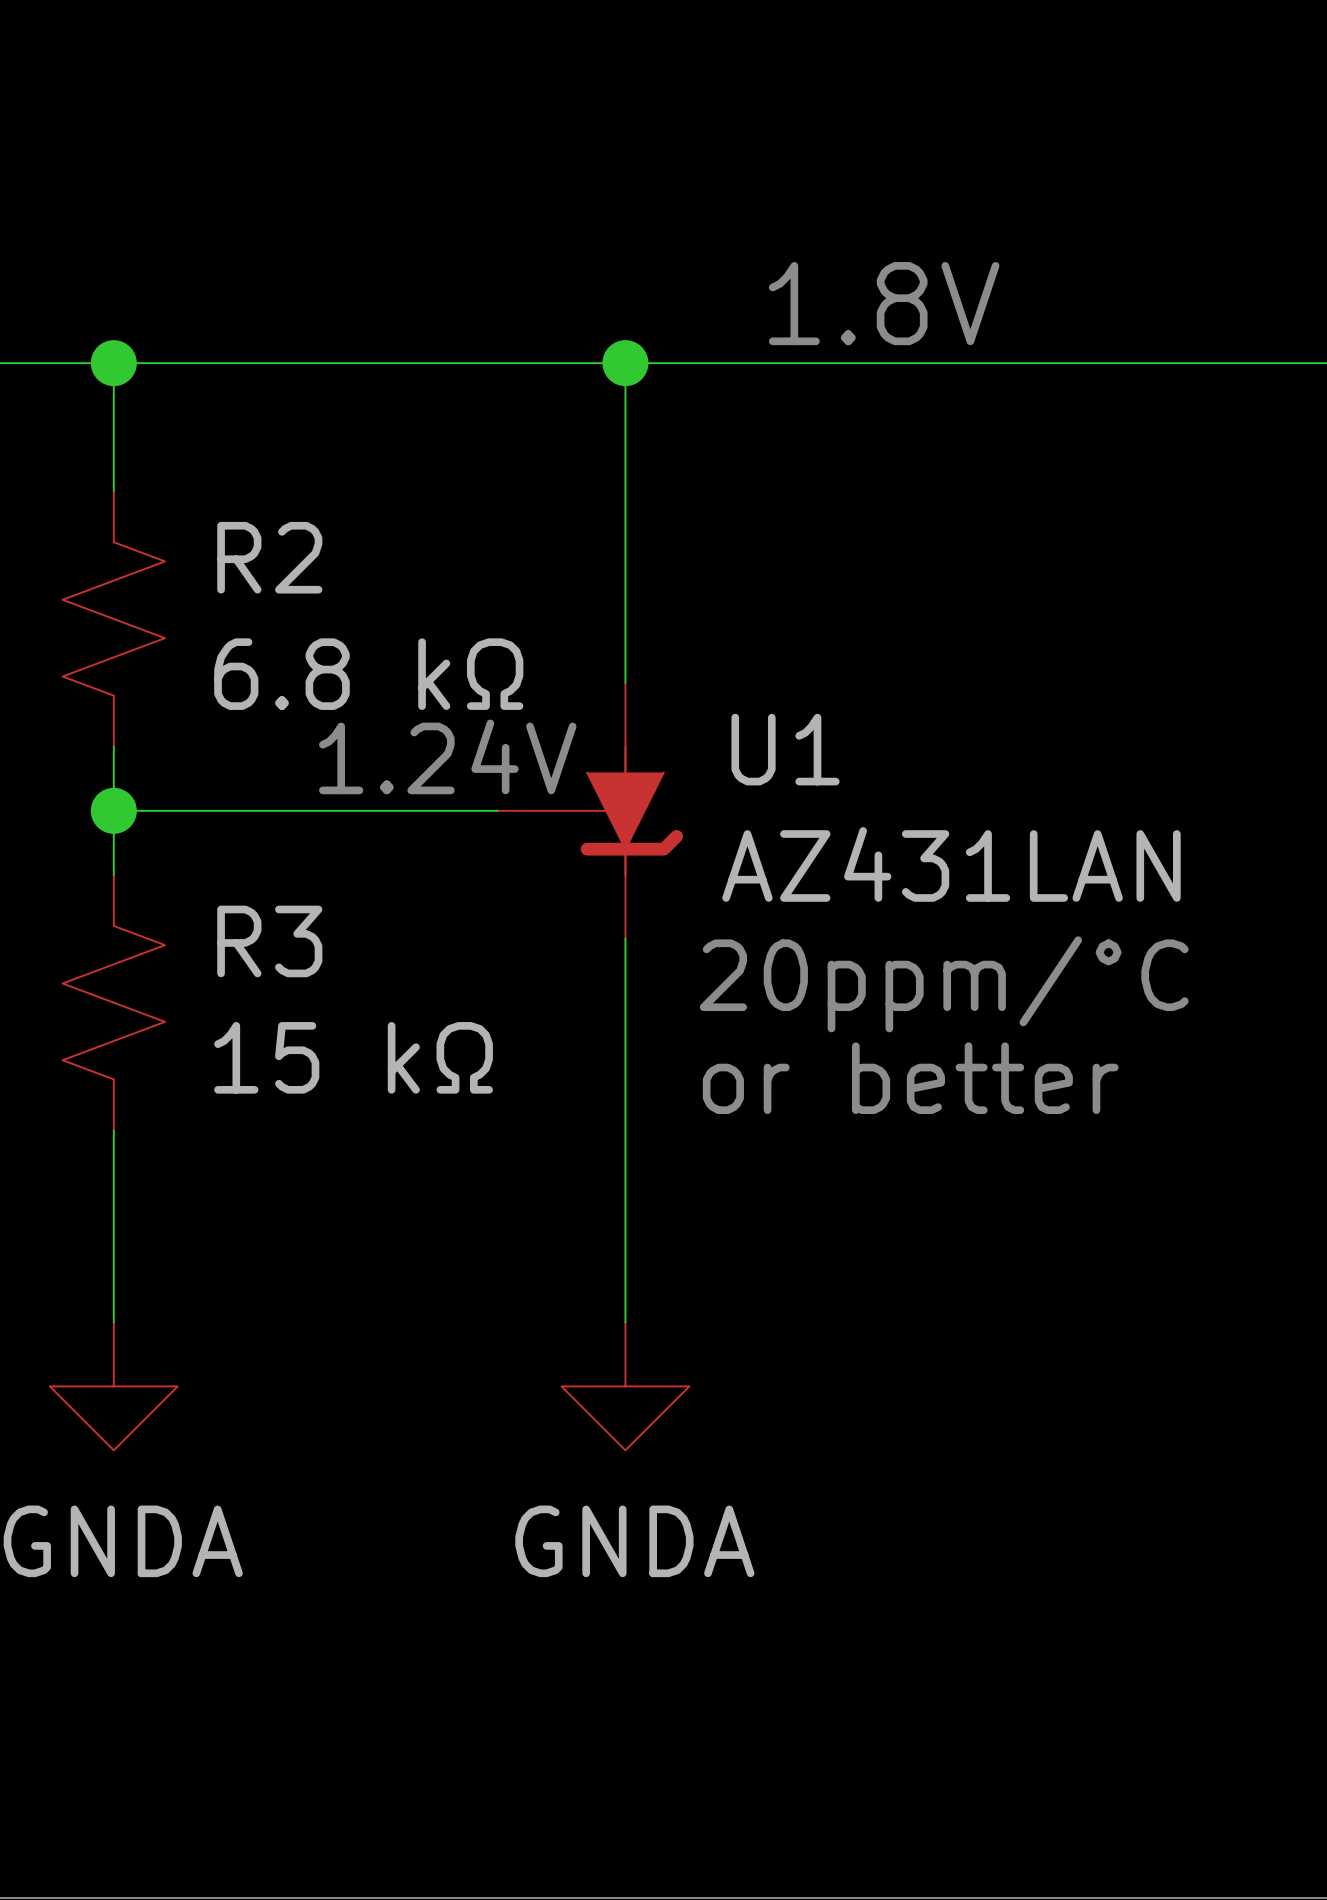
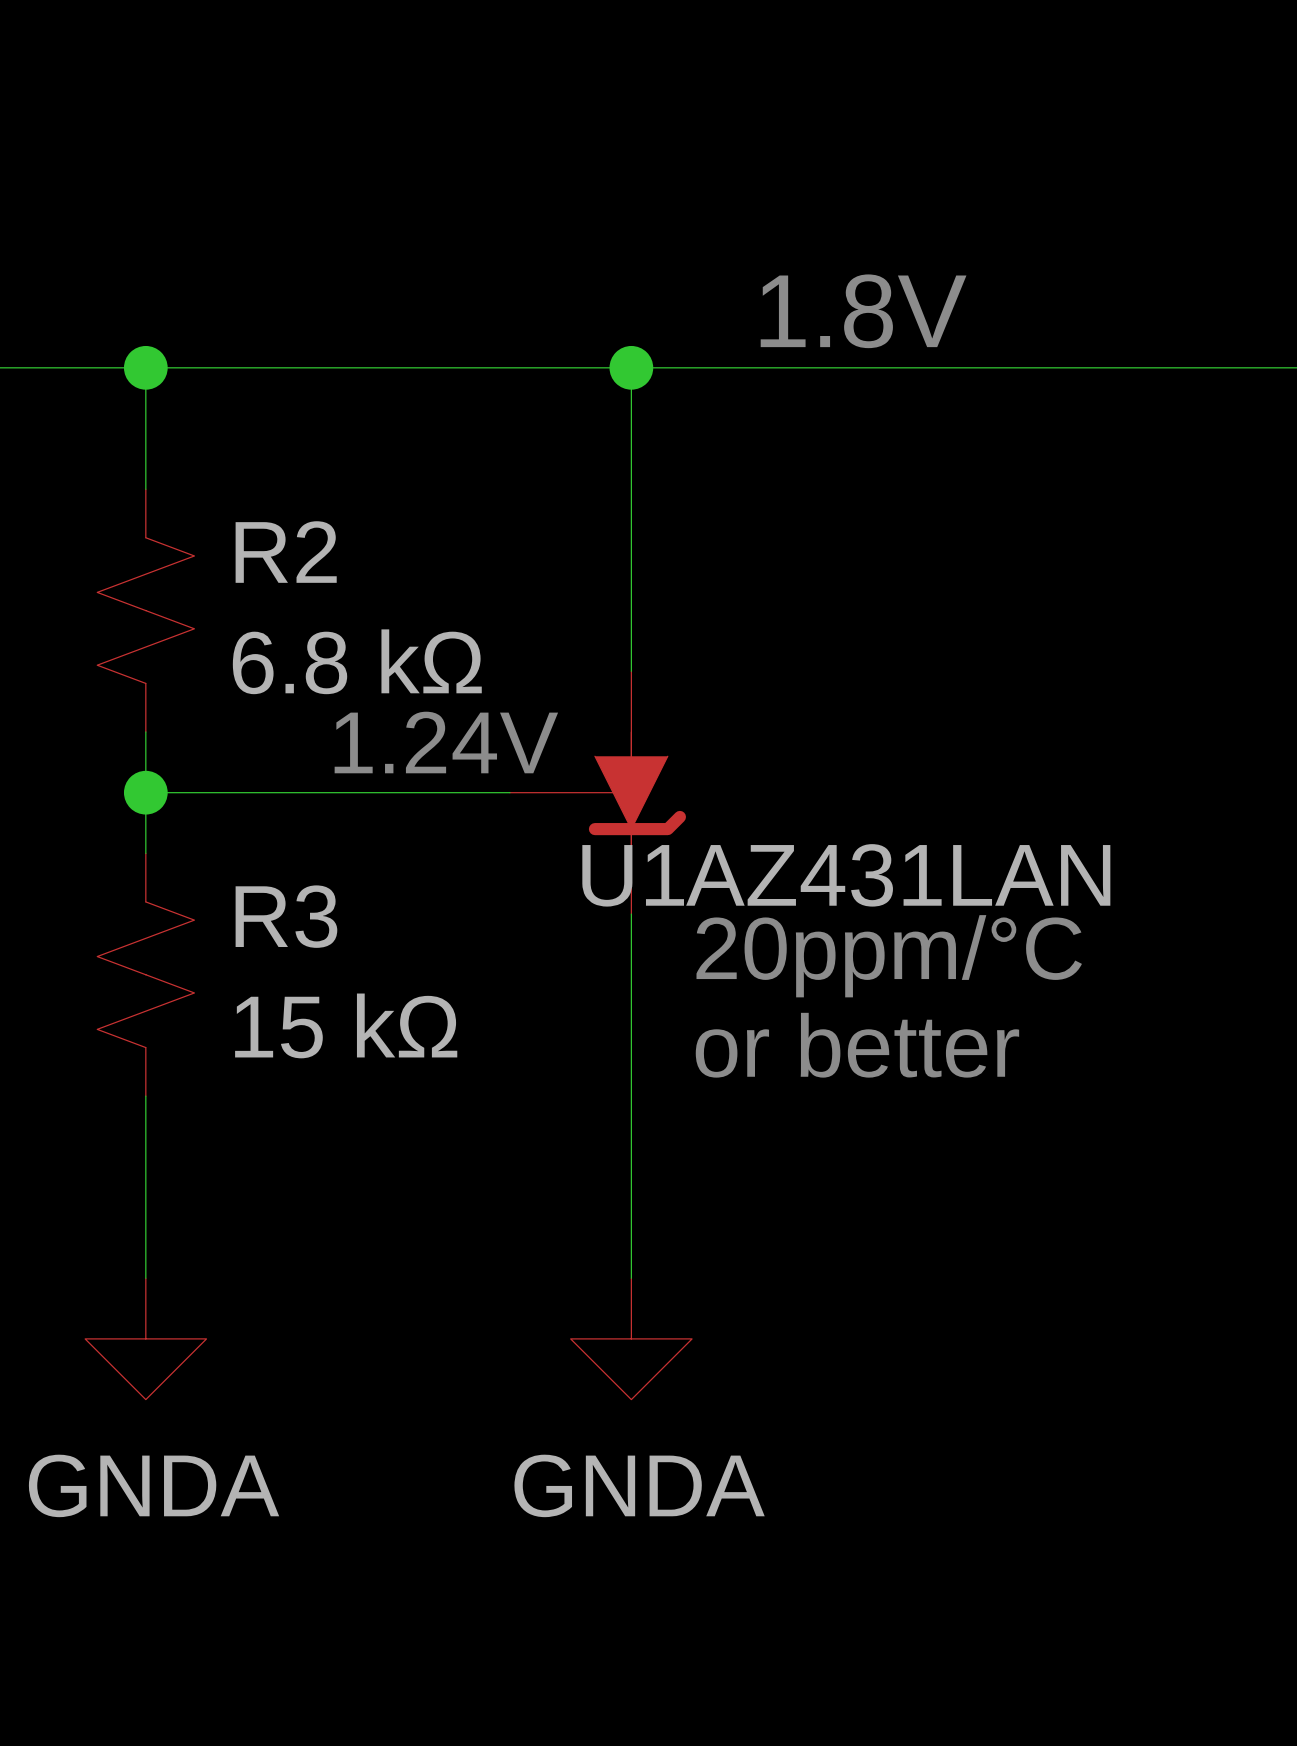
U1 name position: U1 (785, 749) -> U1 (633, 875)
U1 value position: AZ431LAN (951, 864) -> AZ431LAN (898, 875)

